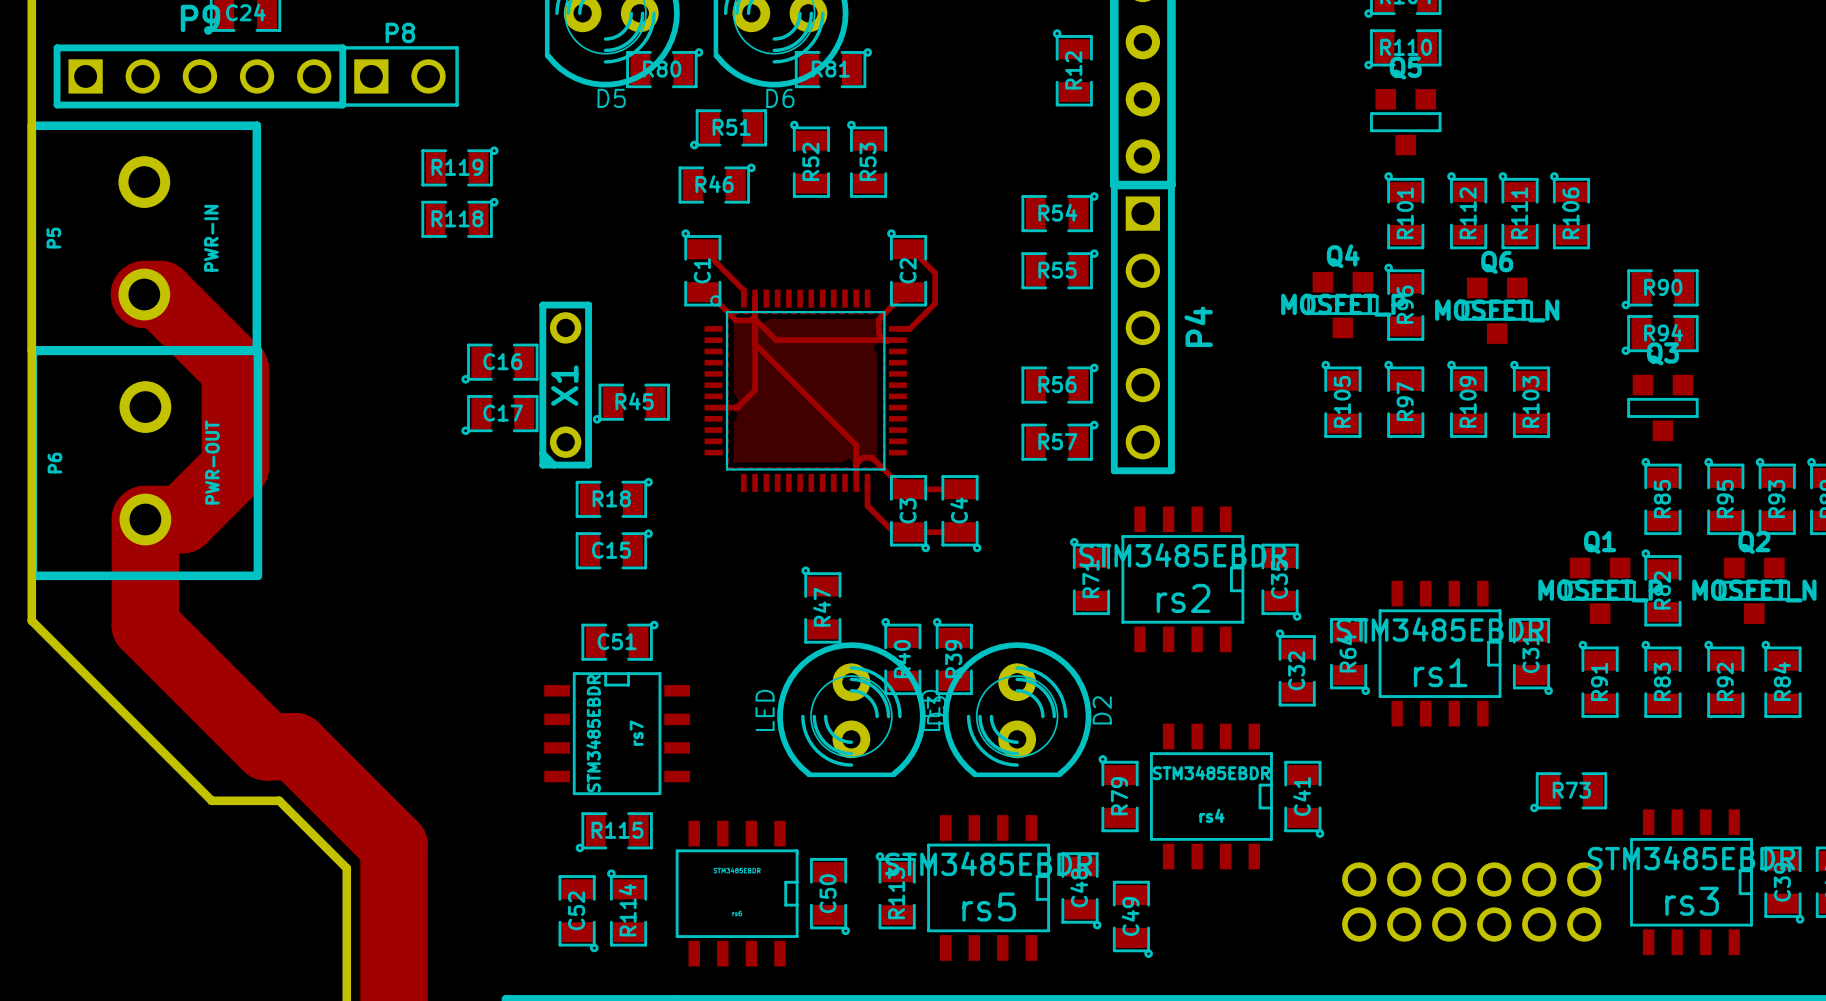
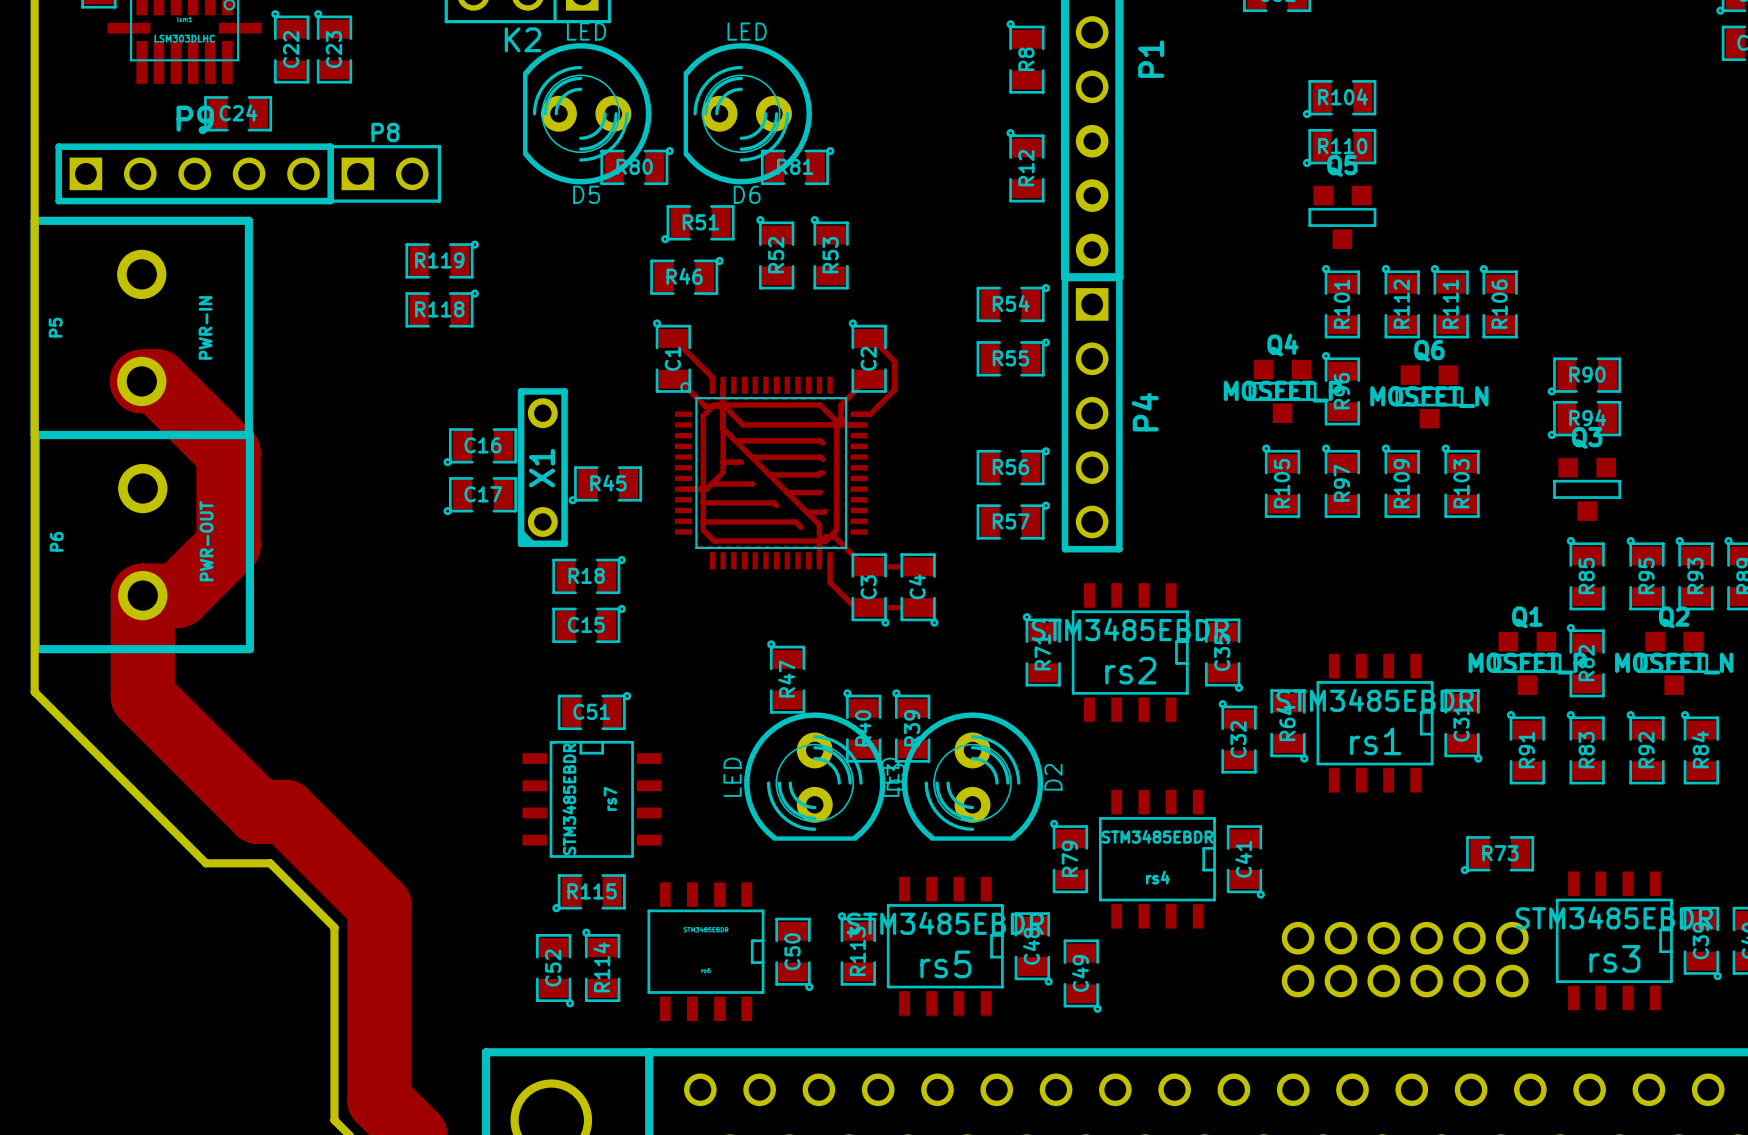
track: none -> (714, 404) (820, 404) (836, 421) (836, 530) (825, 541) (714, 541) (703, 530) (703, 415) (714, 404)
track: none -> (735, 440) (820, 440) (822, 443)
track: none -> (751, 457) (820, 457) (822, 459)
track: none -> (723, 462) (741, 462)
track: none -> (822, 473) (818, 474) (769, 474)
track: none -> (711, 484) (752, 484)
track: none -> (820, 492) (787, 492)
track: none -> (703, 502) (773, 502) (776, 505)
track: none -> (825, 511) (806, 512)
track: none -> (703, 521) (795, 521) (801, 527)

